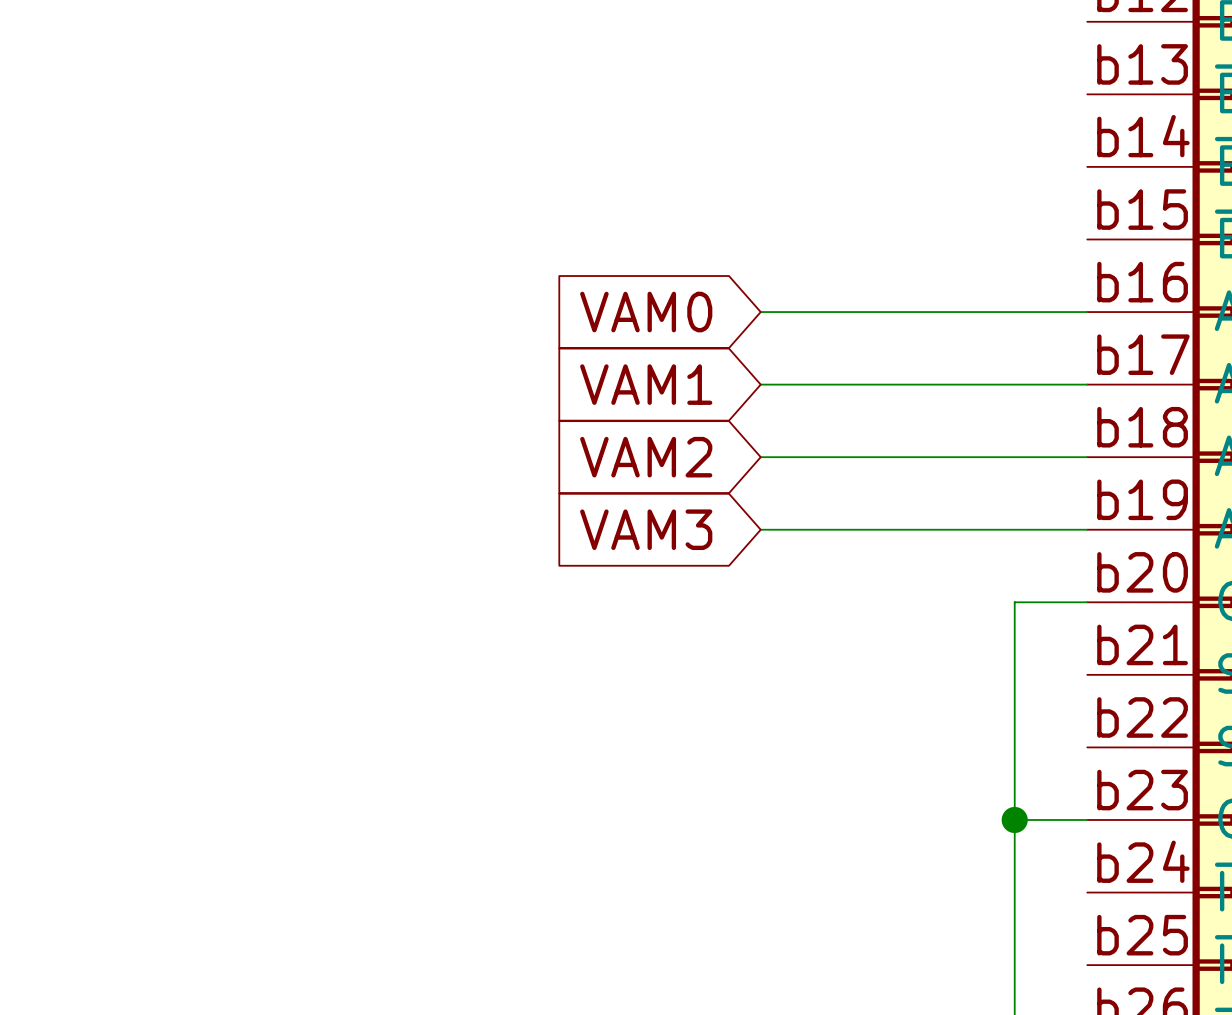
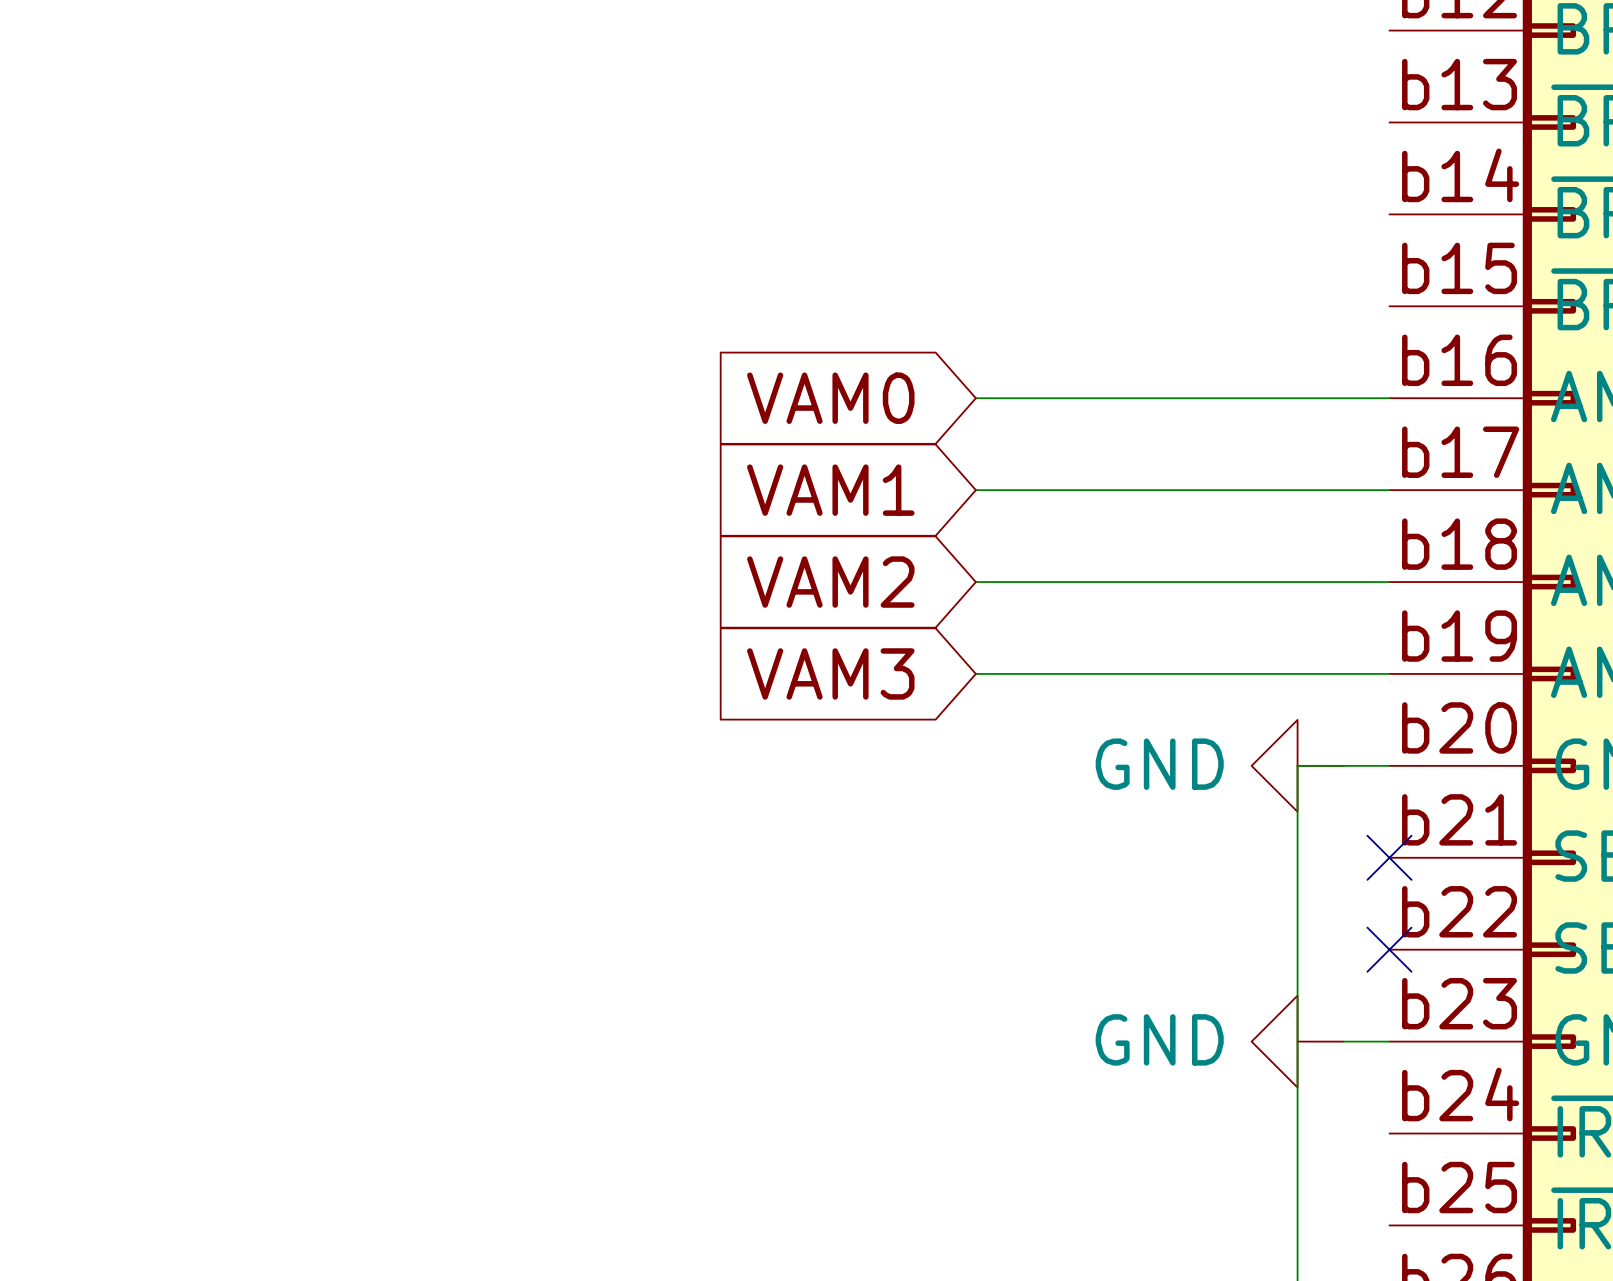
power symbol: none -> GND (1297, 765)
no-connect mark: none -> (1389, 857)
no-connect mark: none -> (1389, 949)
junction: (1014, 819) -> none
power symbol: none -> GND (1297, 1041)

